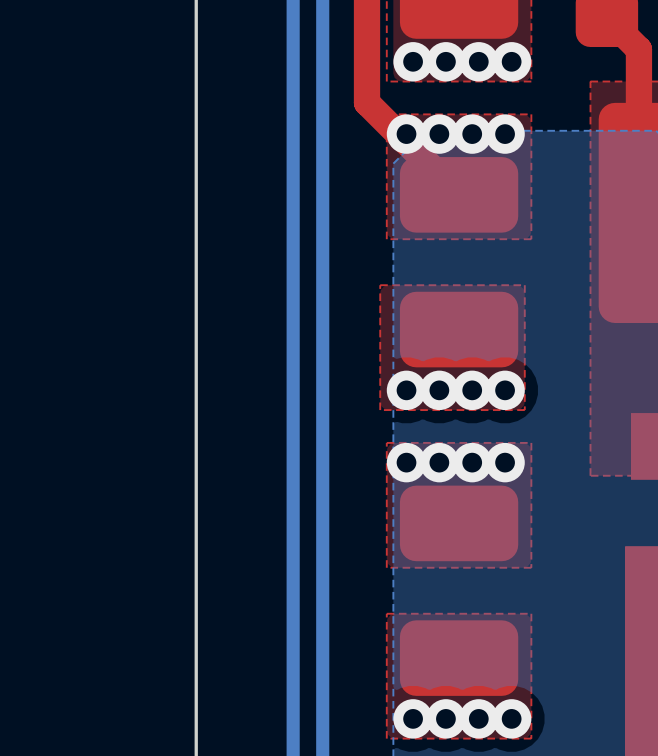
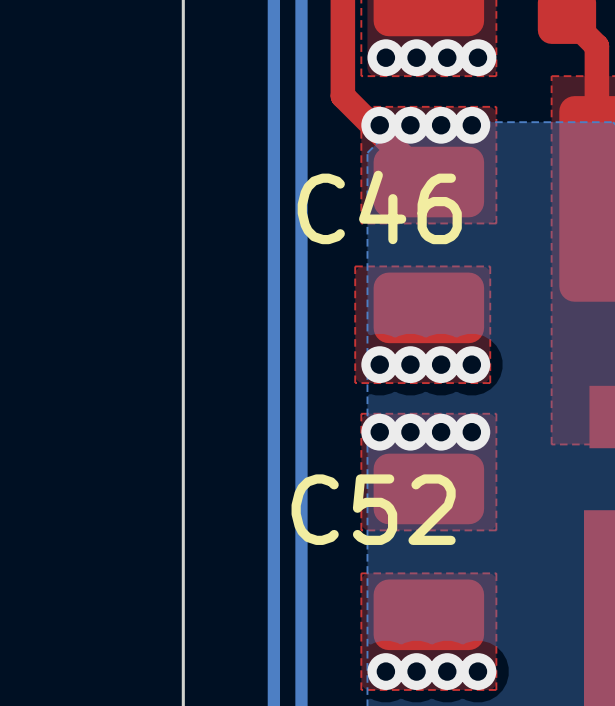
C46 name: none -> C46 (379, 207)
C52 name: none -> C52 (373, 509)

